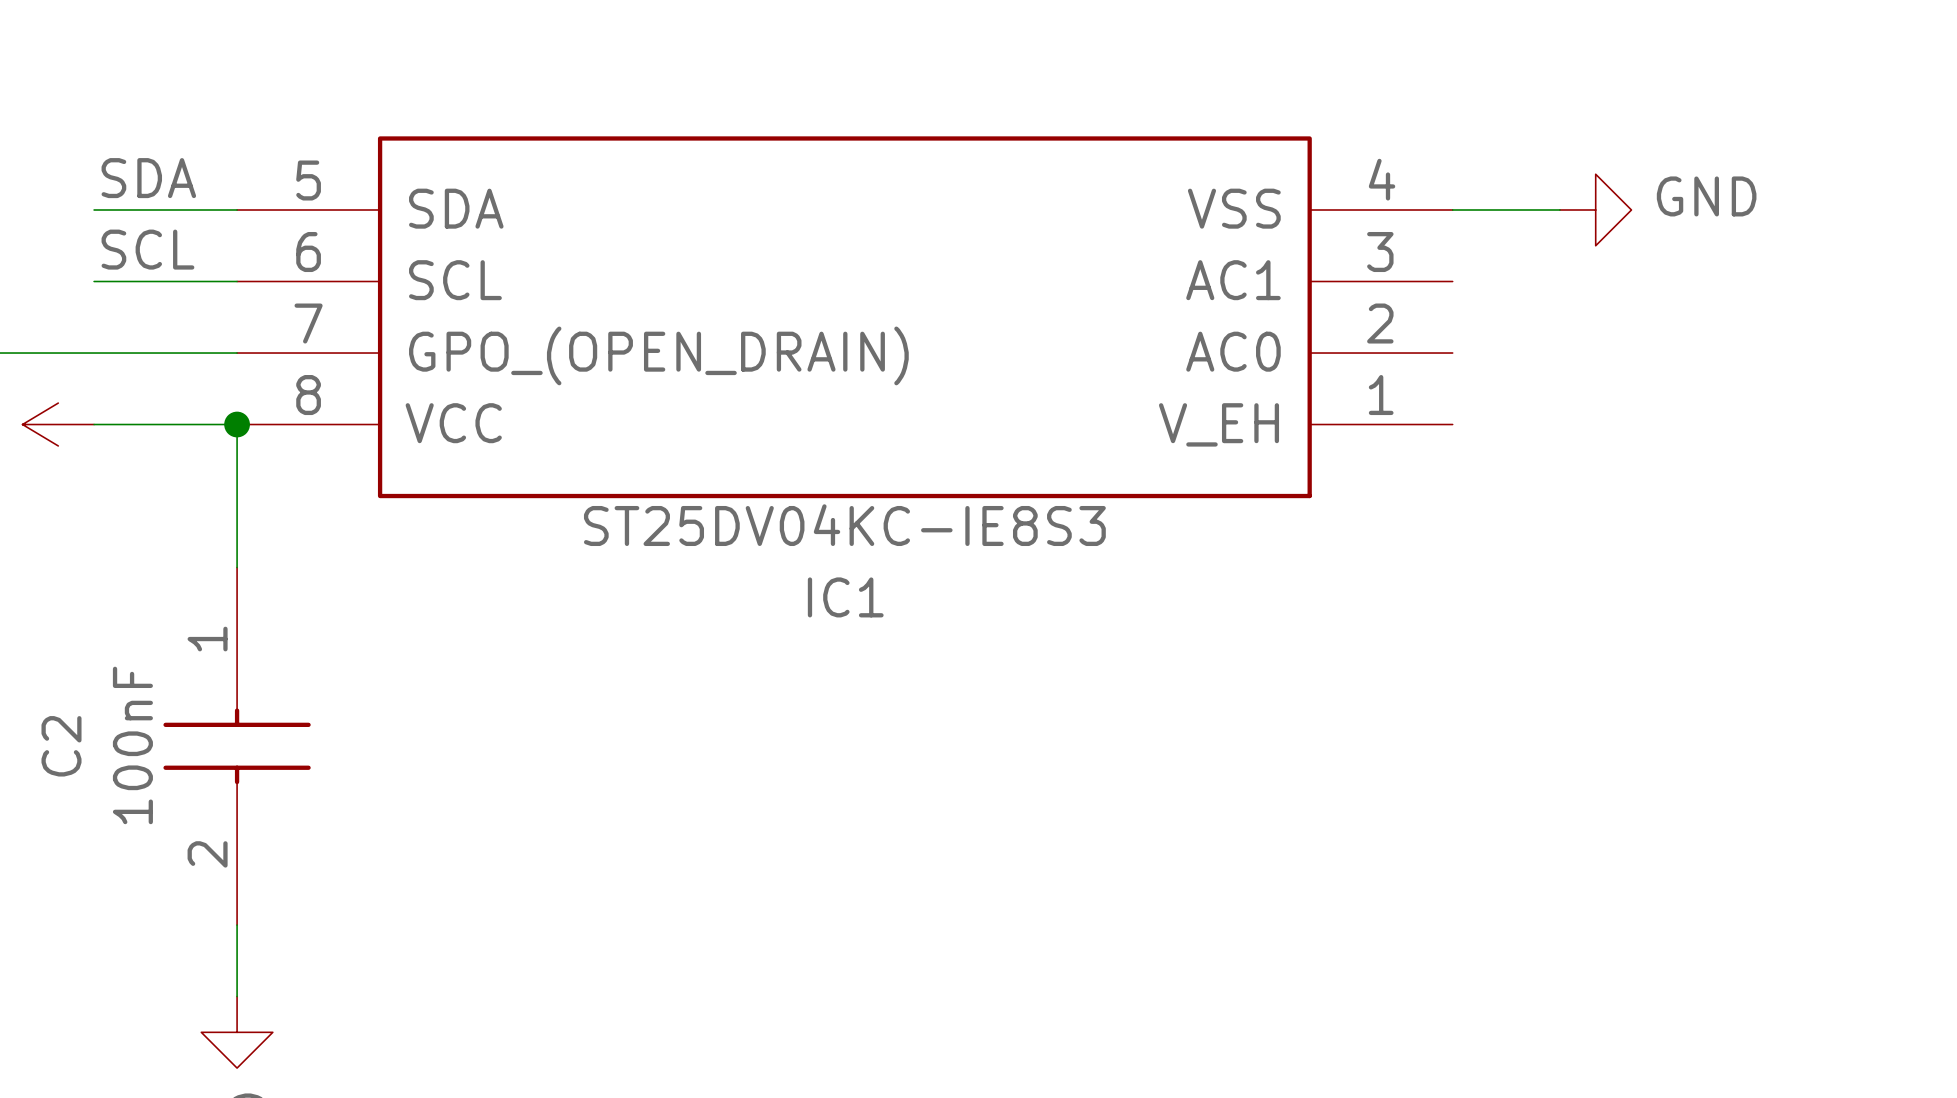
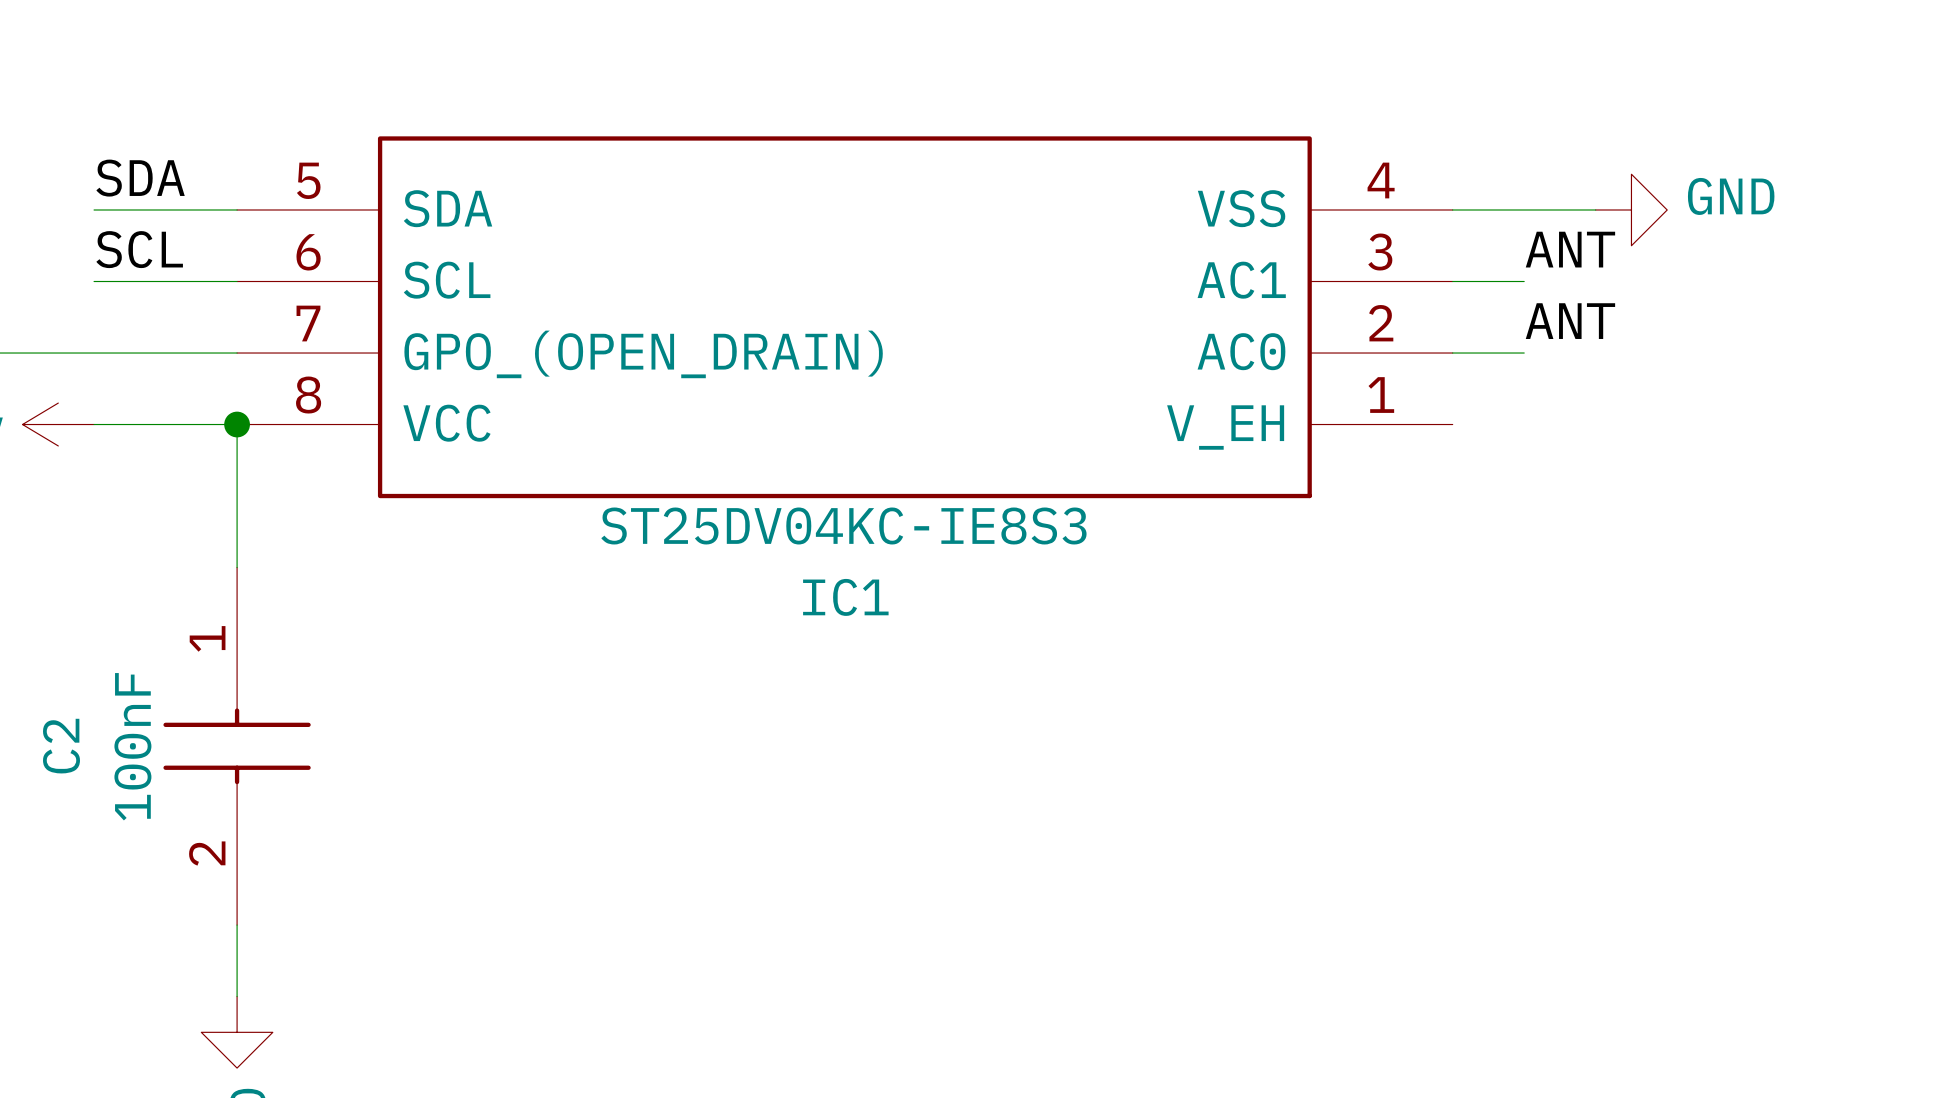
power symbol position: GND (1595, 209) -> GND (1631, 209)
label: none -> ANT (1570, 249)
wire: none -> (1452, 281) (1524, 281)
label: none -> ANT (1570, 321)
wire: none -> (1452, 353) (1524, 353)

